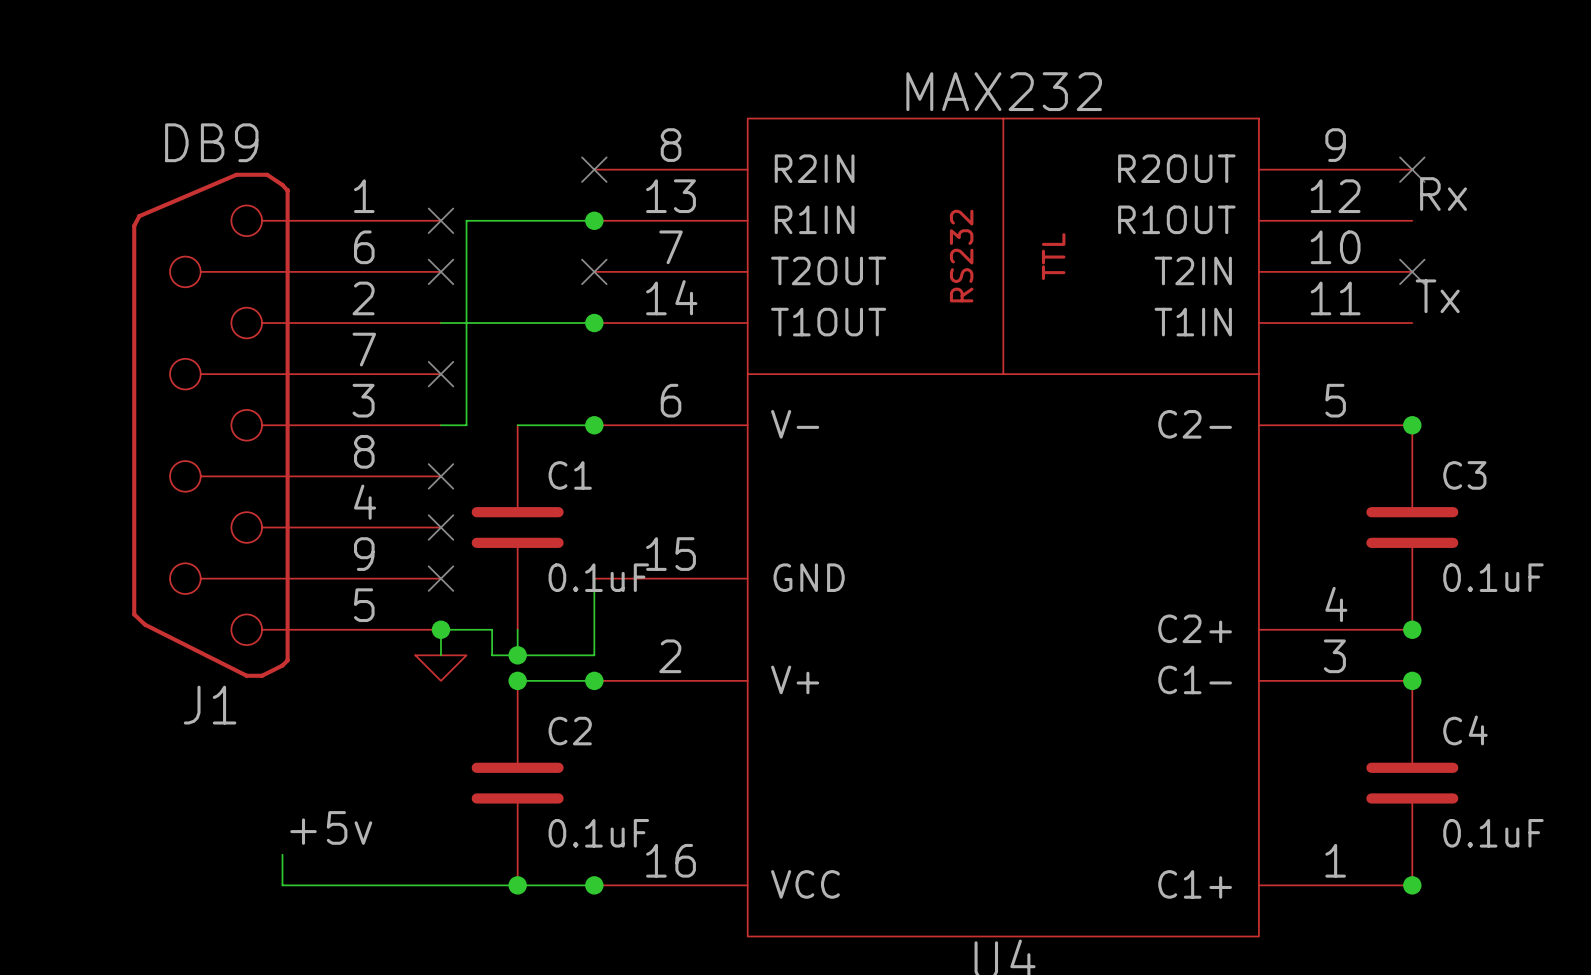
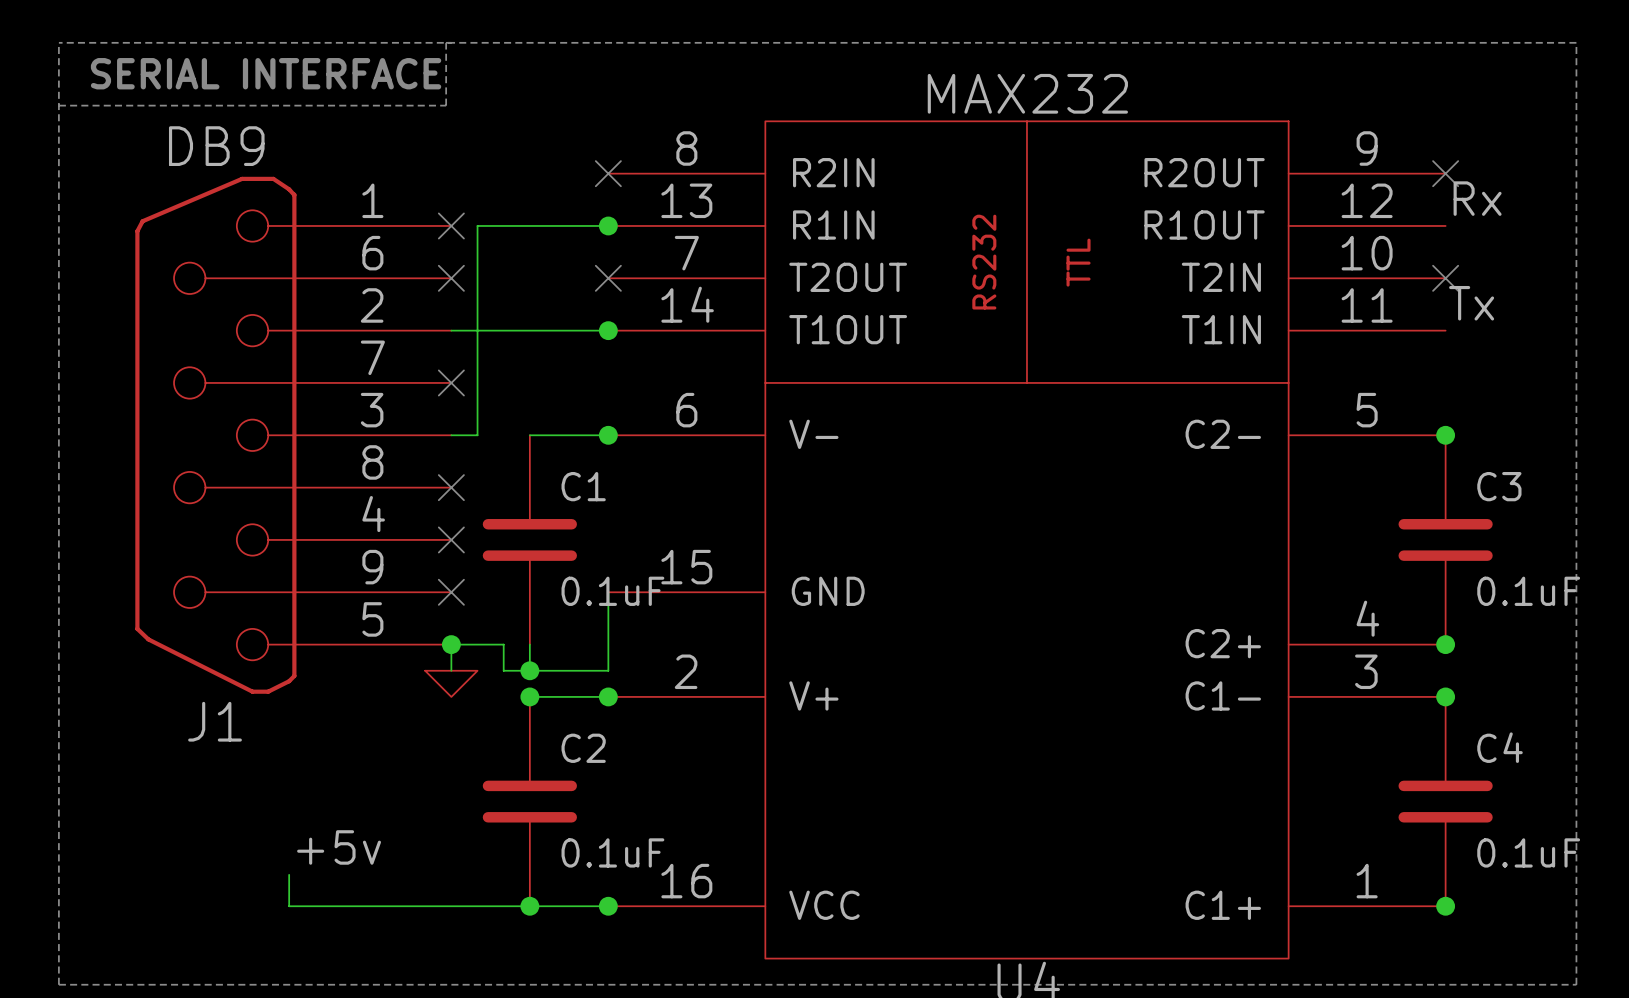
line: none -> (58, 42) (58, 984) (1576, 984) (1576, 42) (58, 42)
line: none -> (446, 42) (446, 105) (58, 105)
text: none -> SERIAL INTERFACE (266, 73)

